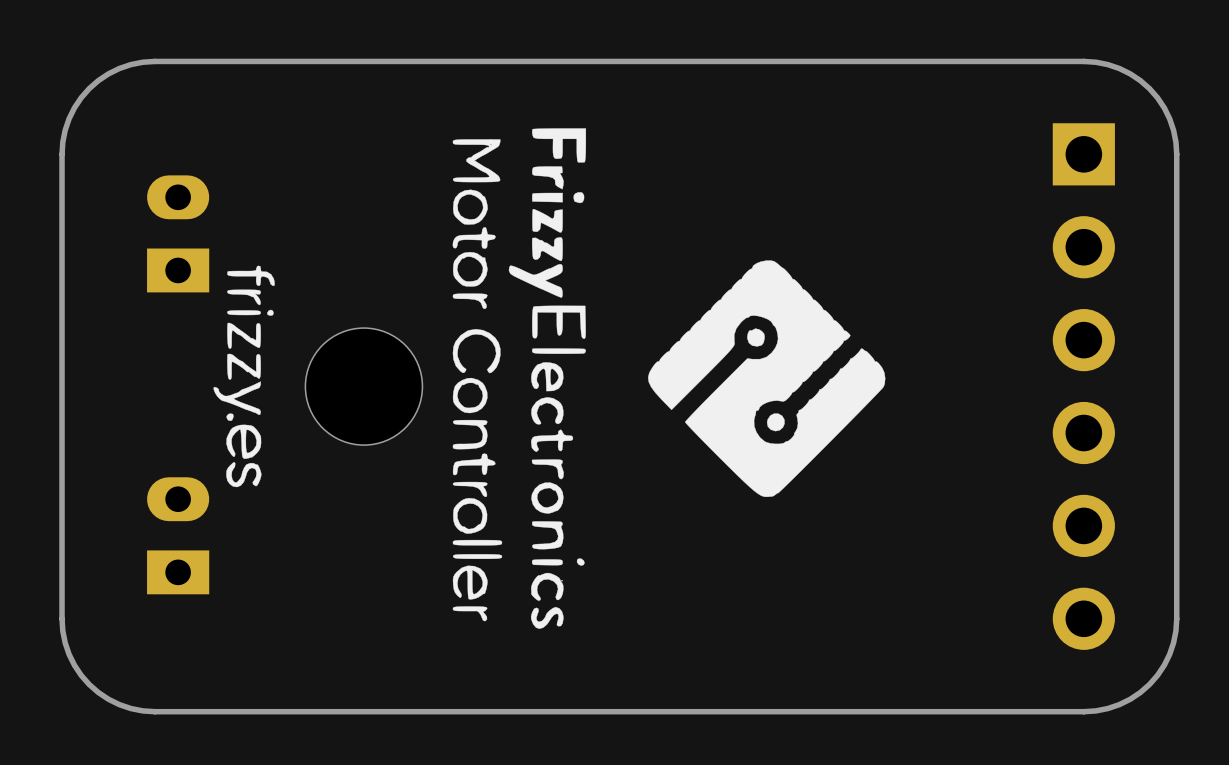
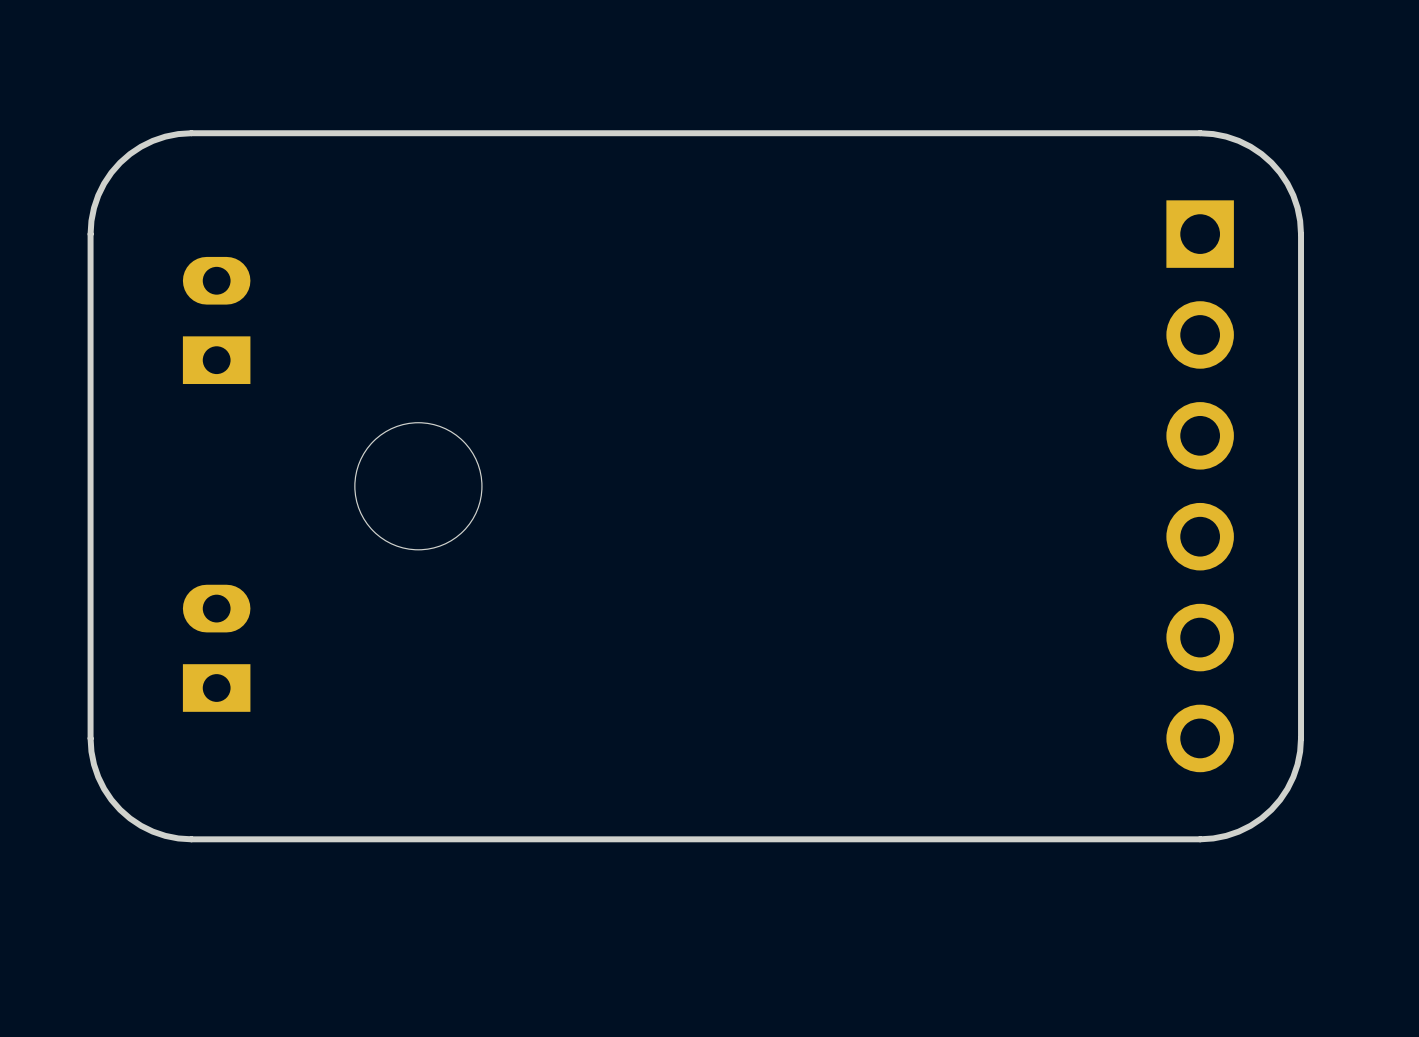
drawing: [213, 128, 886, 629] -> none

